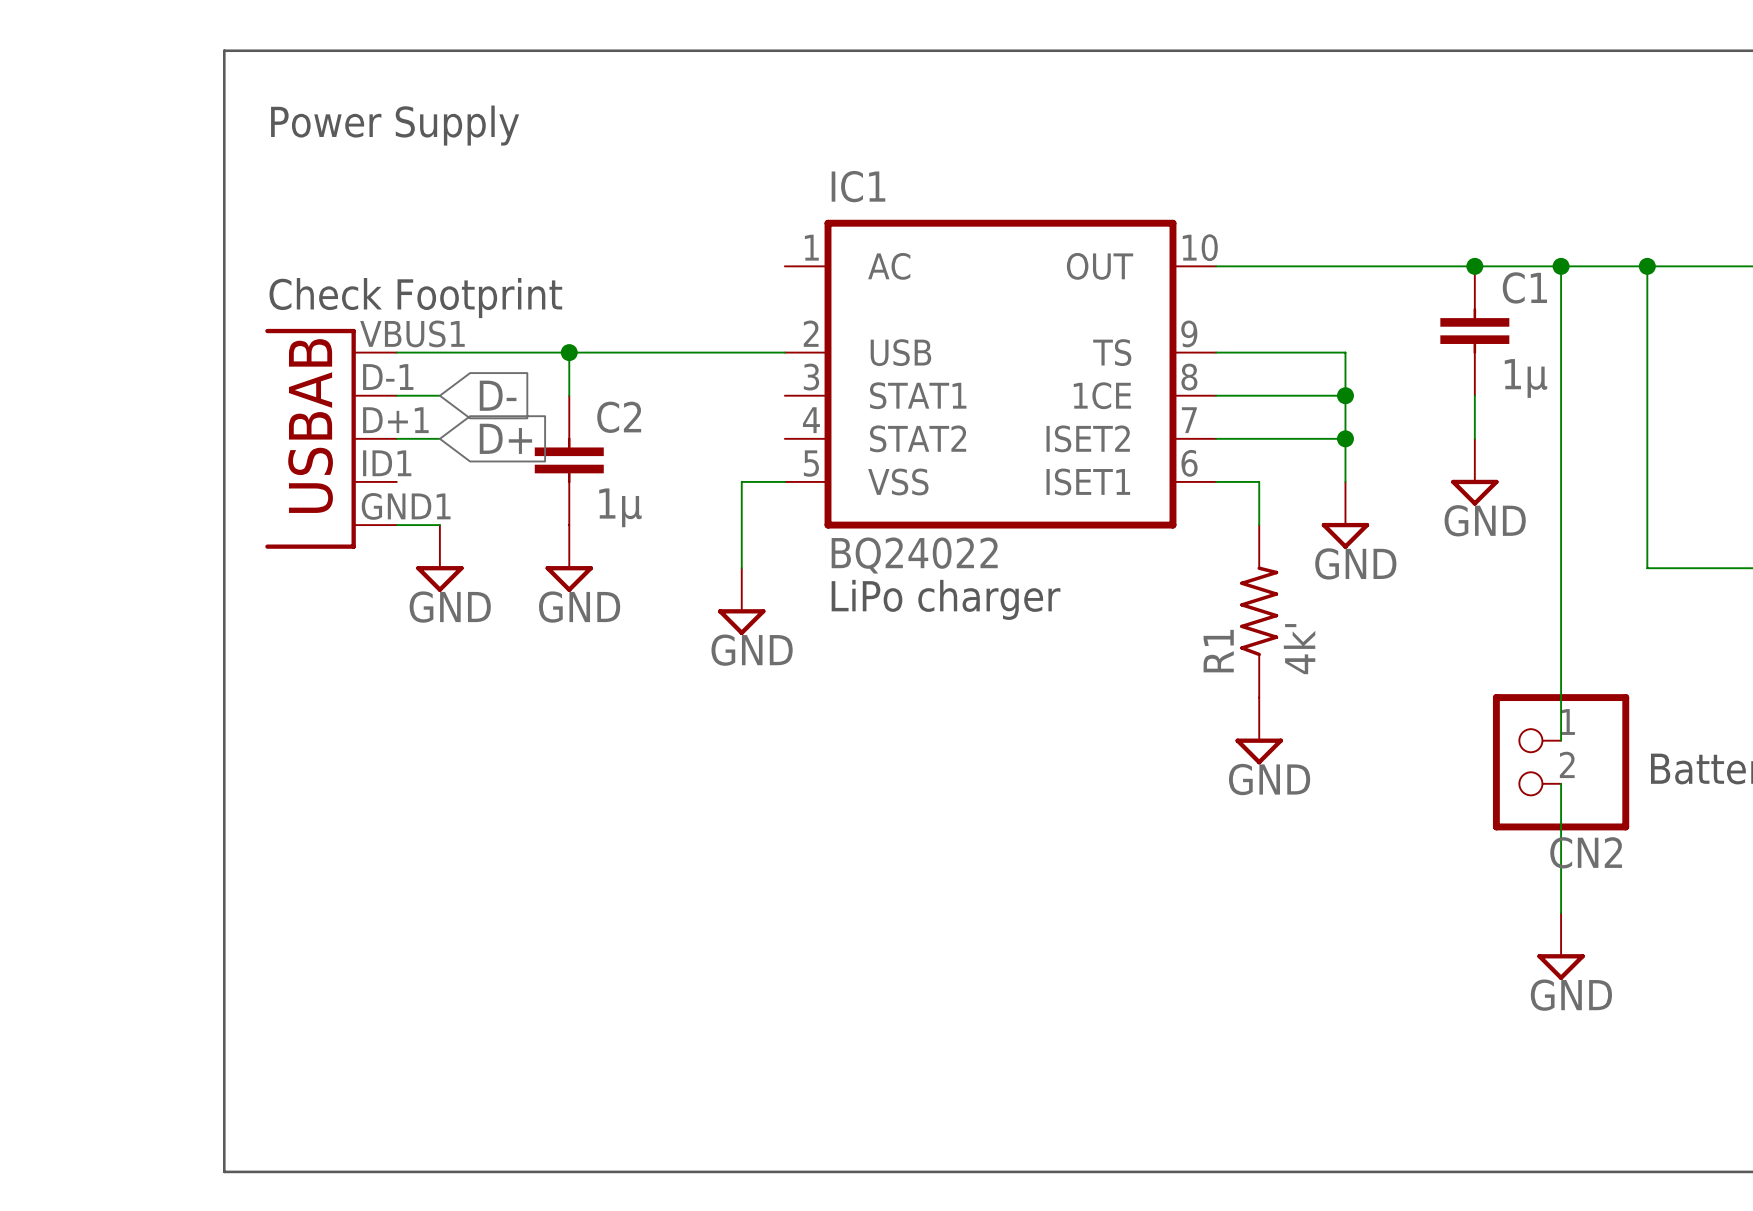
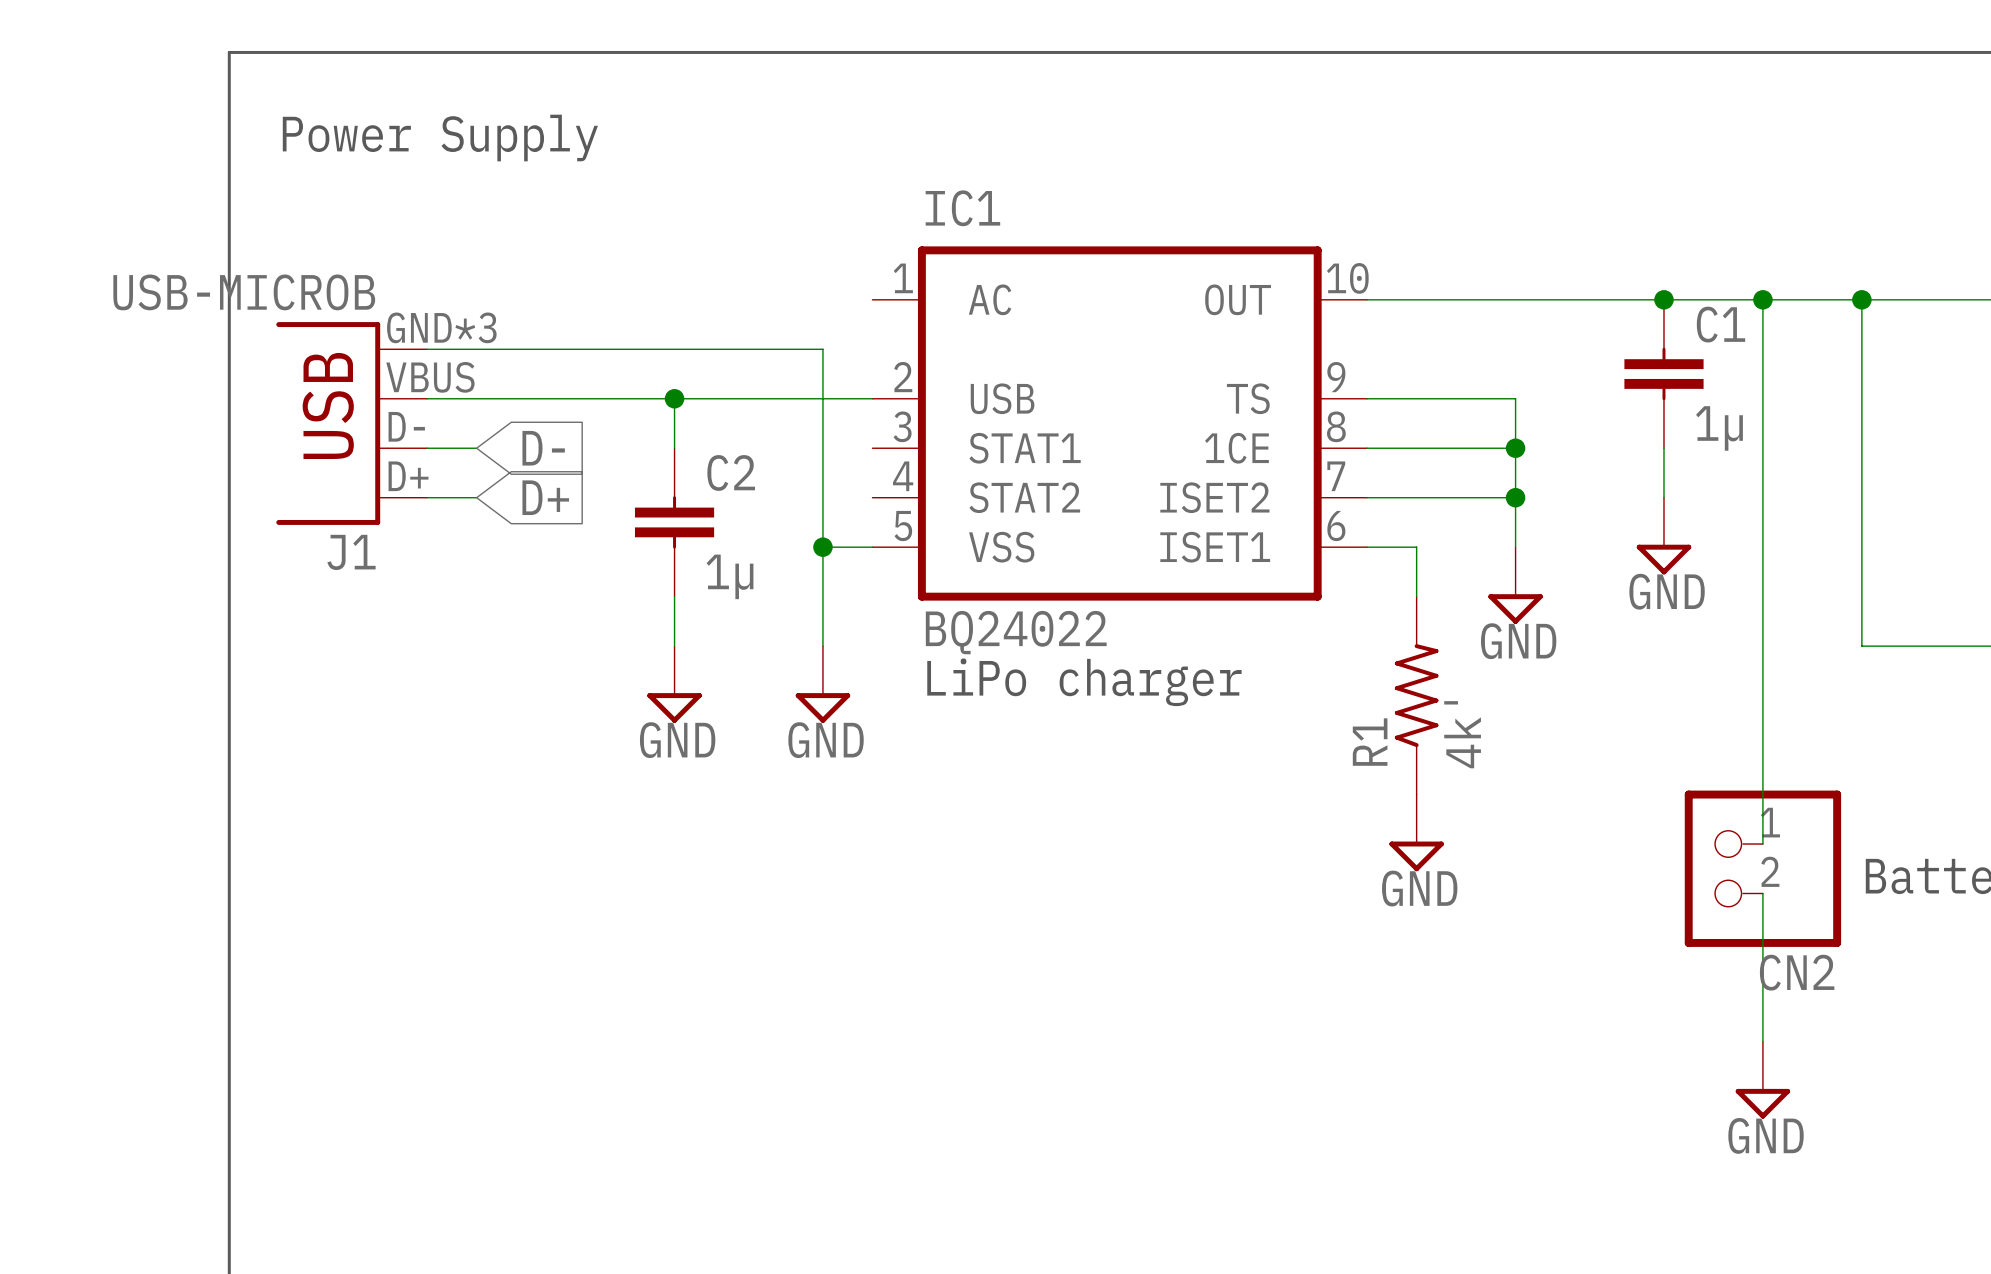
text: Check Footprint (415, 298) -> none
wire: none -> (427, 349) (822, 349) (822, 547)
wire: (569, 352) (569, 395) -> (674, 398) (674, 448)
junction position: (569, 352) -> (674, 398)
J1: none -> USB-MICROB (351, 423)
part: (331, 438) -> none
C2 position: (569, 460) -> (674, 522)
junction: none -> (822, 547)
wire: (396, 525) (439, 525) -> none
wire: none -> (674, 596) (674, 646)
power symbol: GND (439, 558) -> none
power symbol position: GND (569, 558) -> GND (674, 684)

